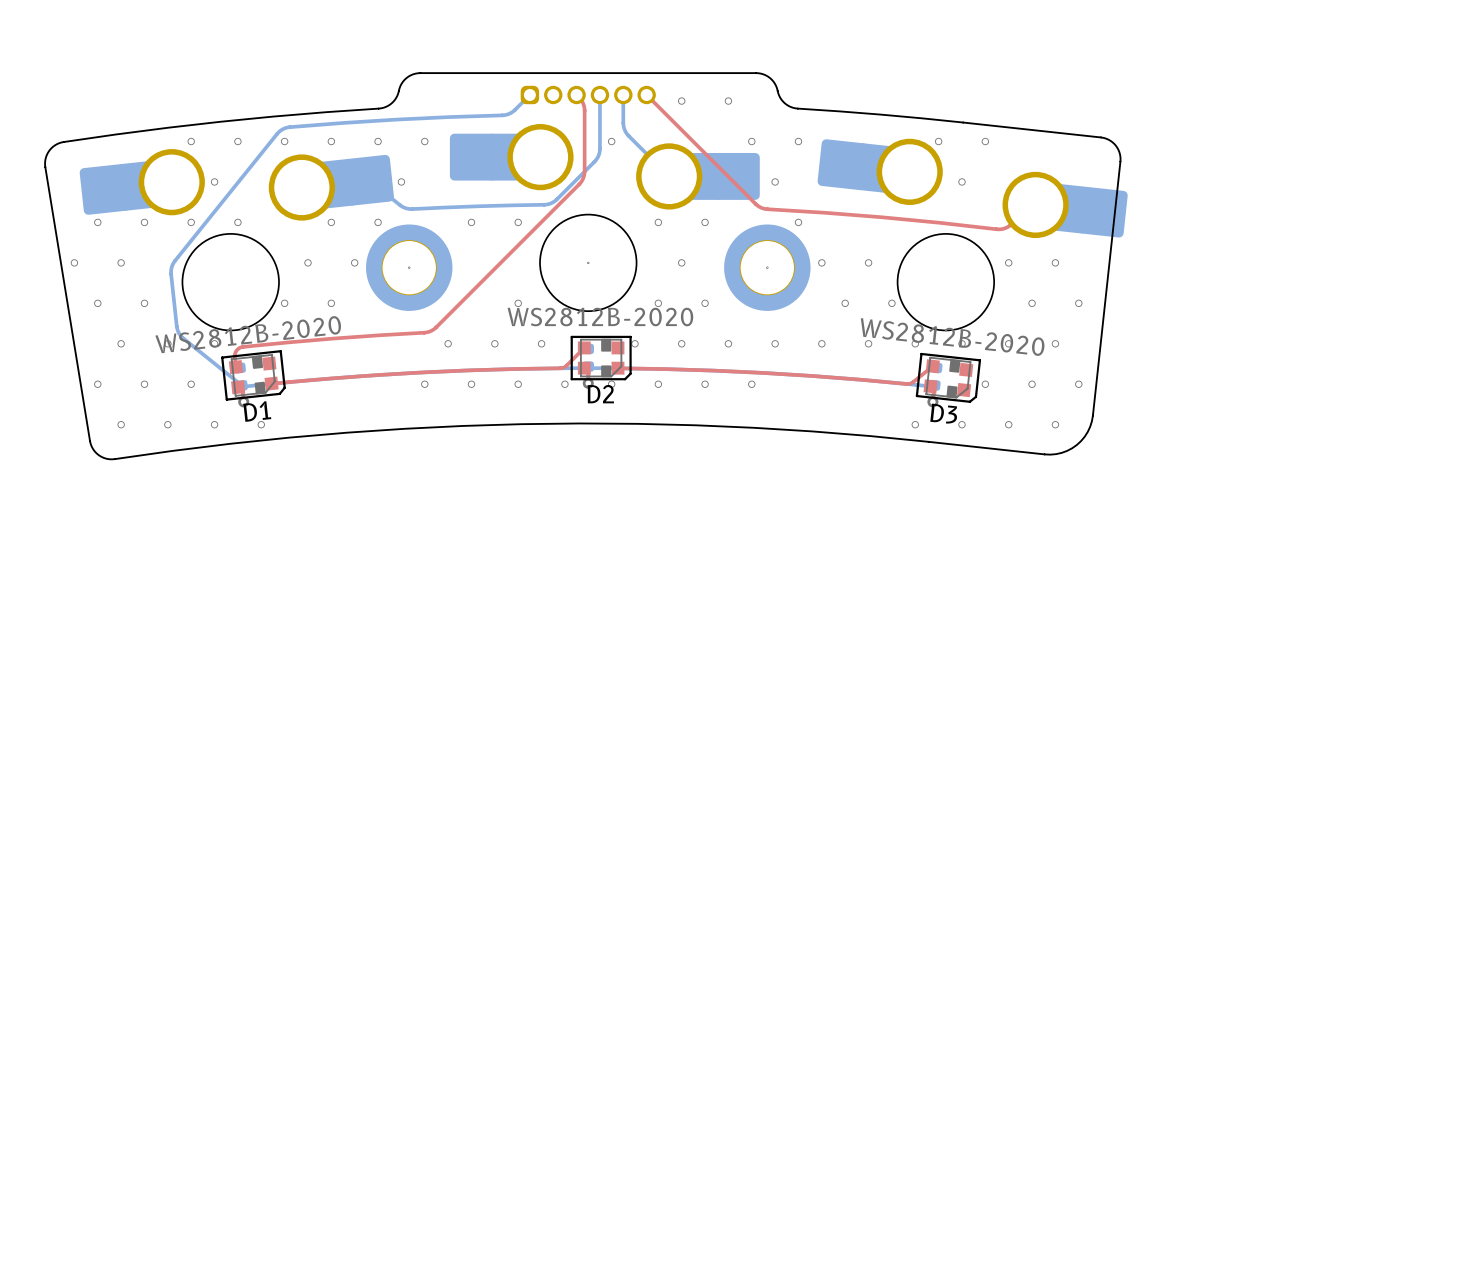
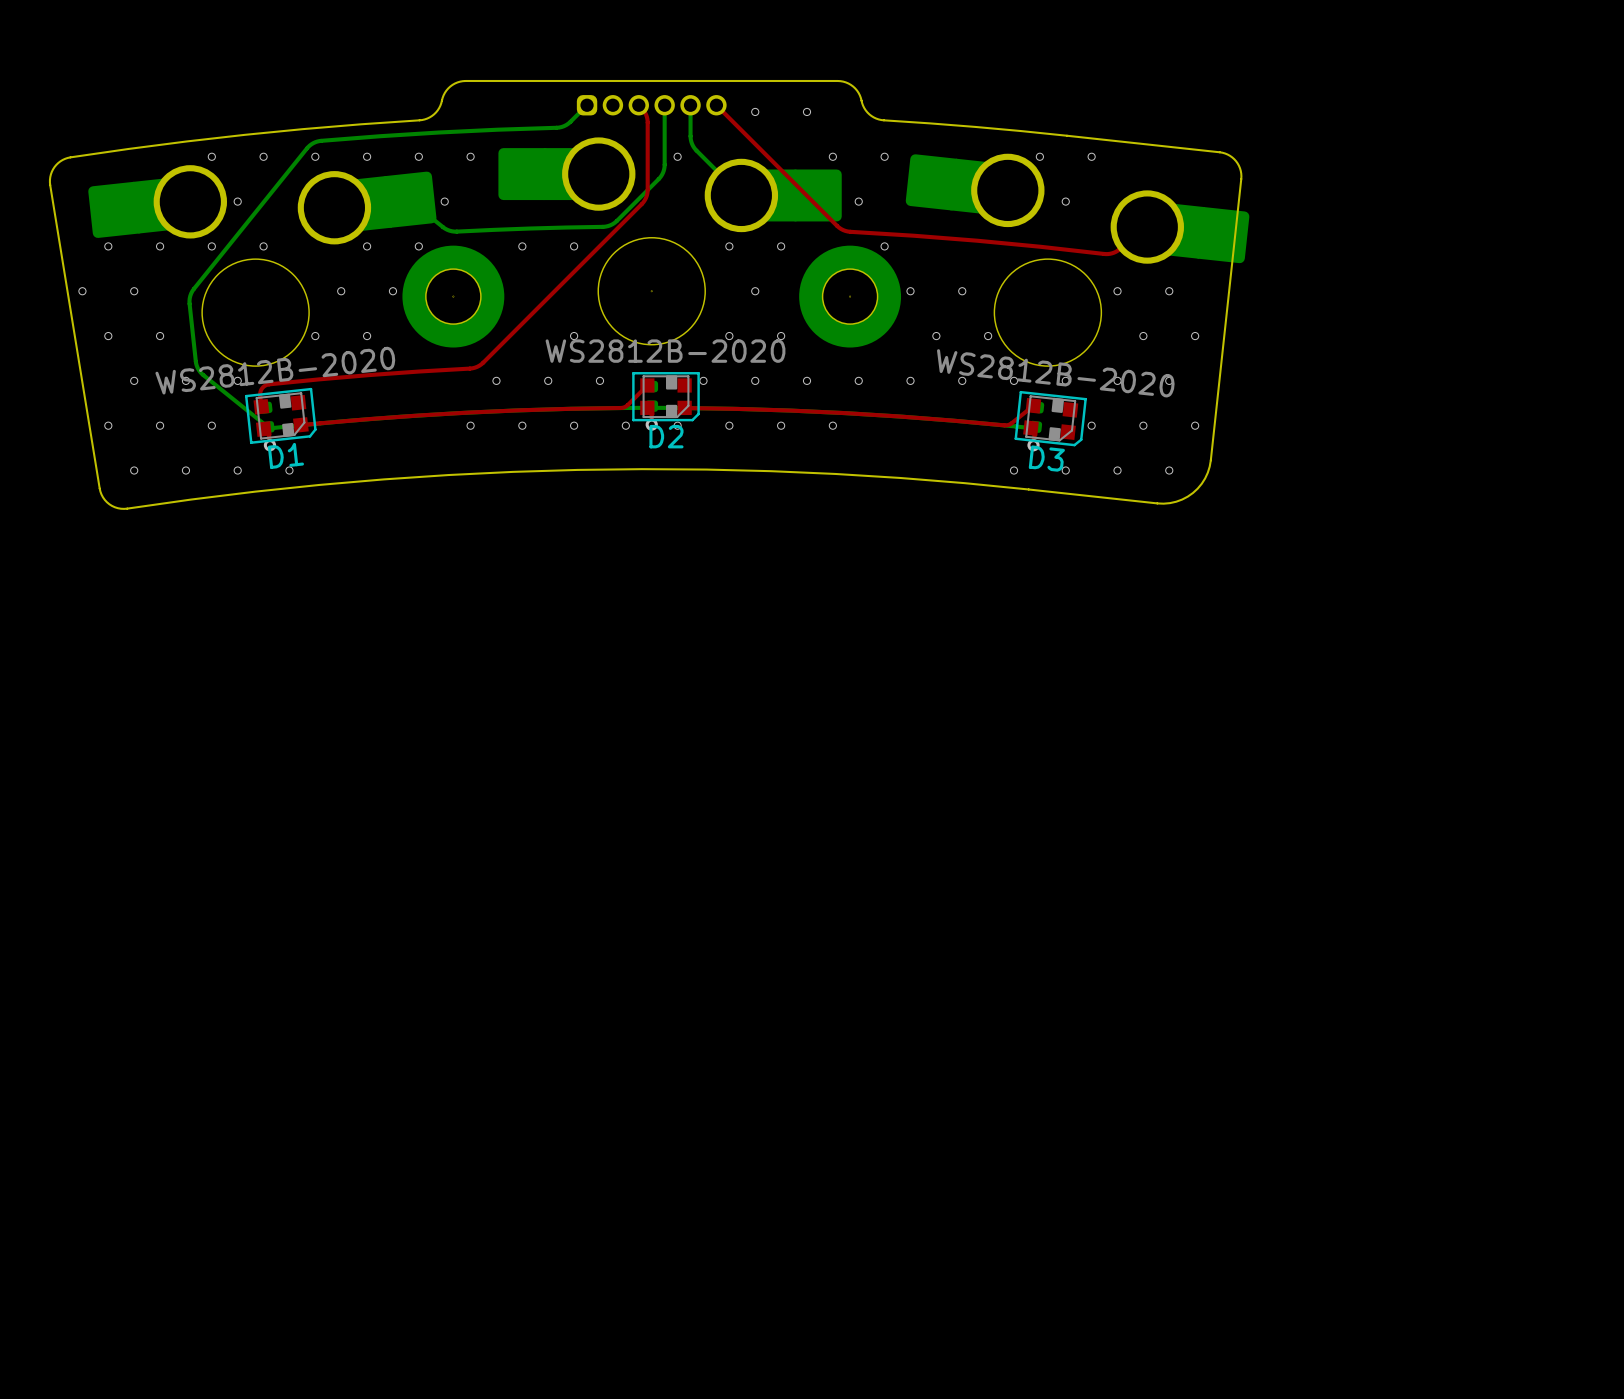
part footprint: [366, 224, 453, 311] -> [402, 245, 505, 348]
part footprint: [724, 224, 811, 311] -> [799, 245, 902, 348]

